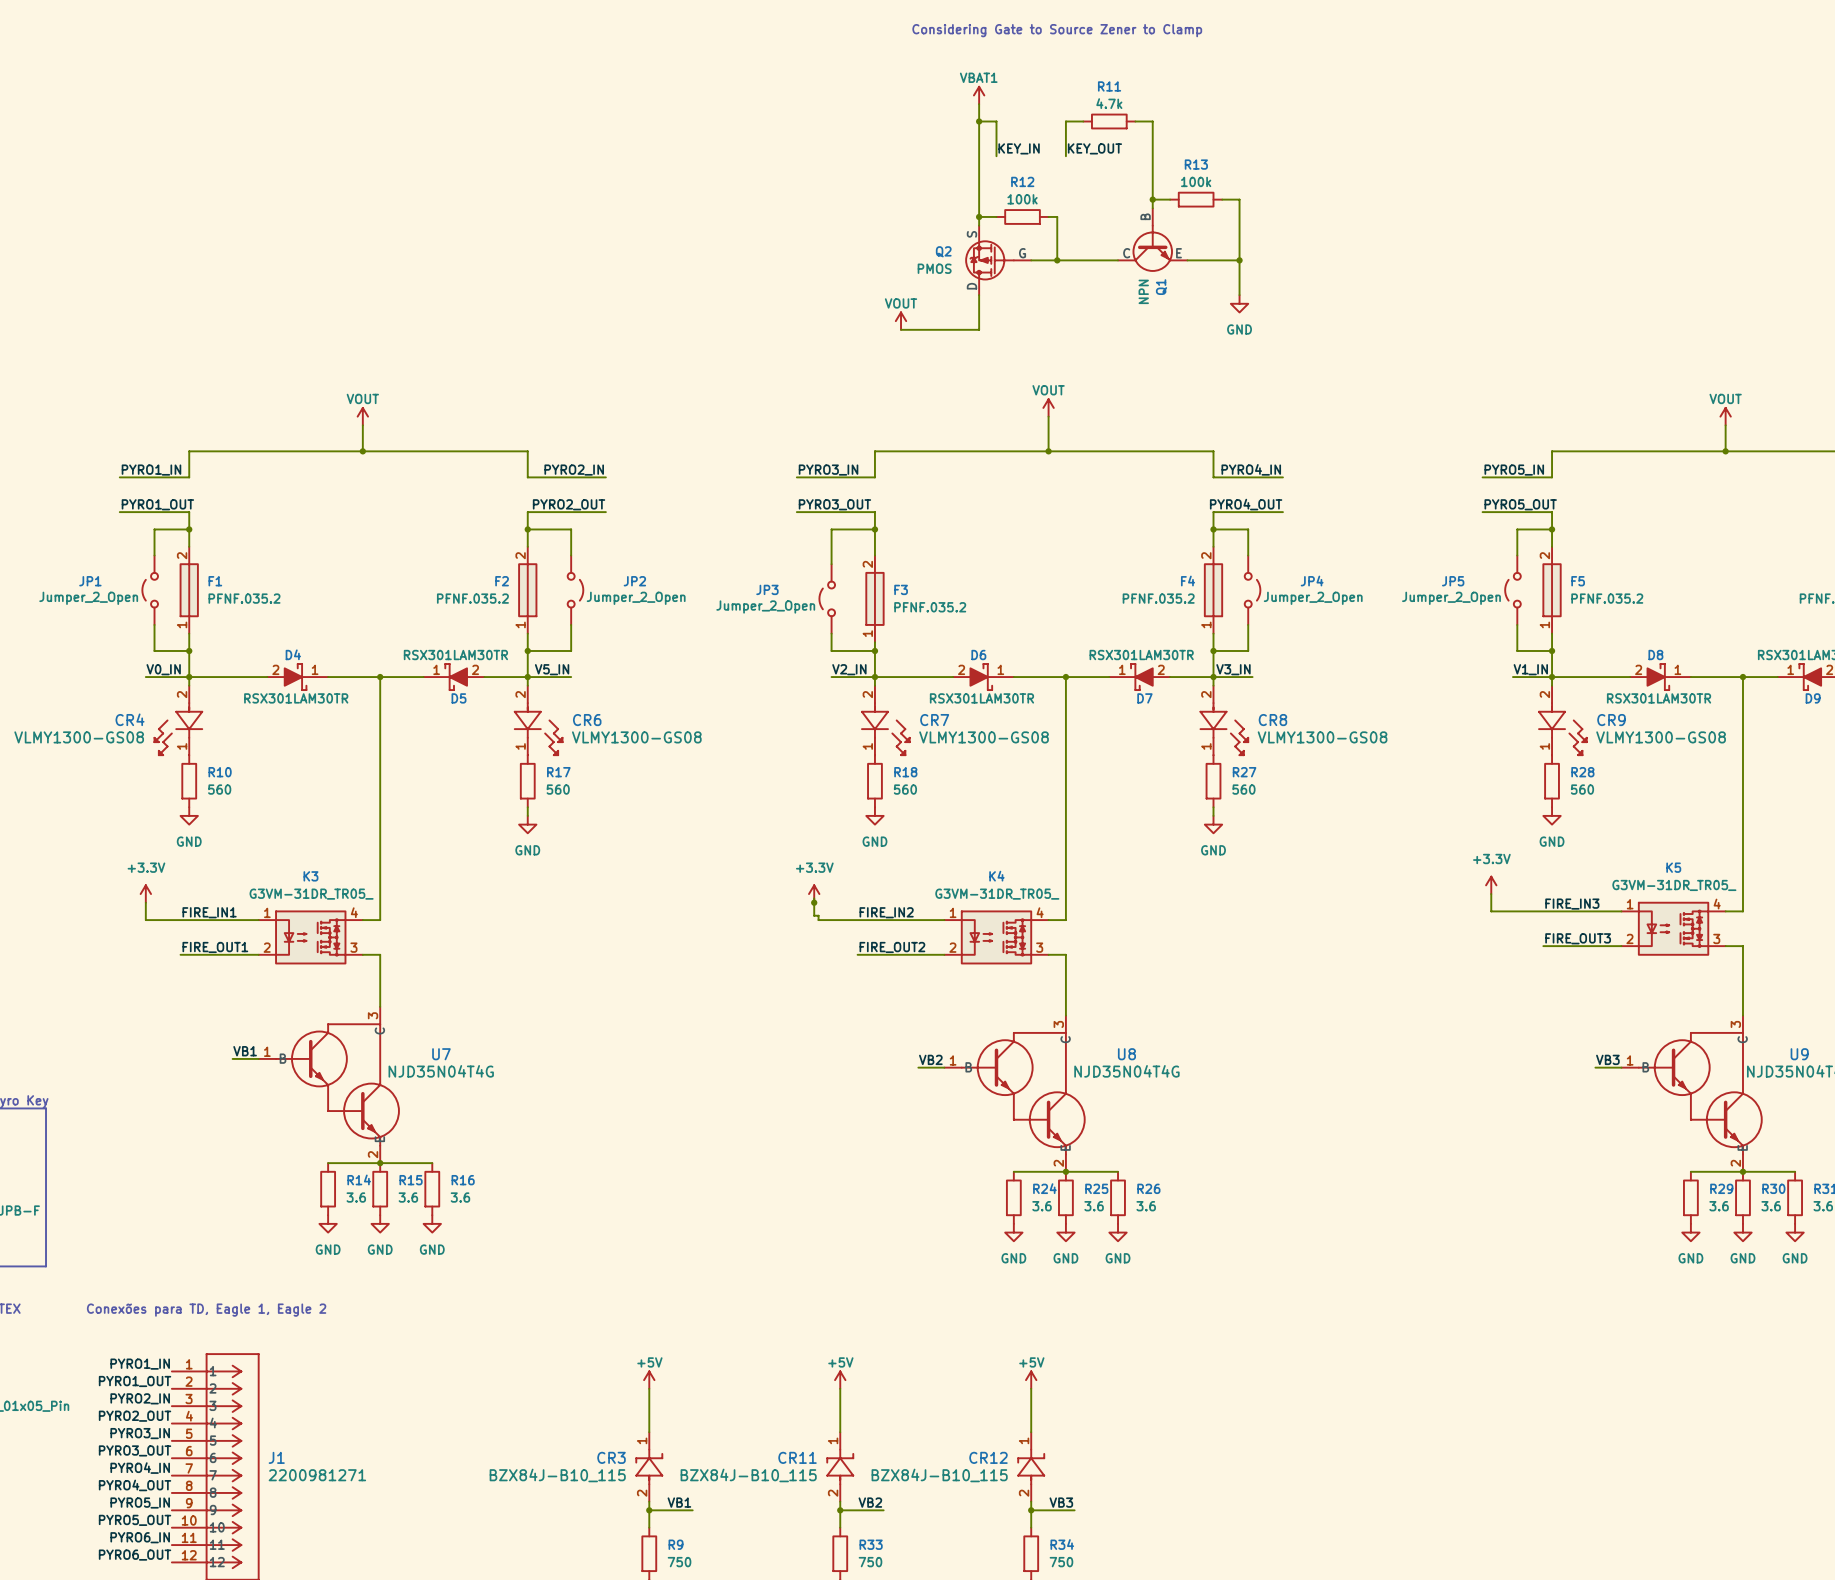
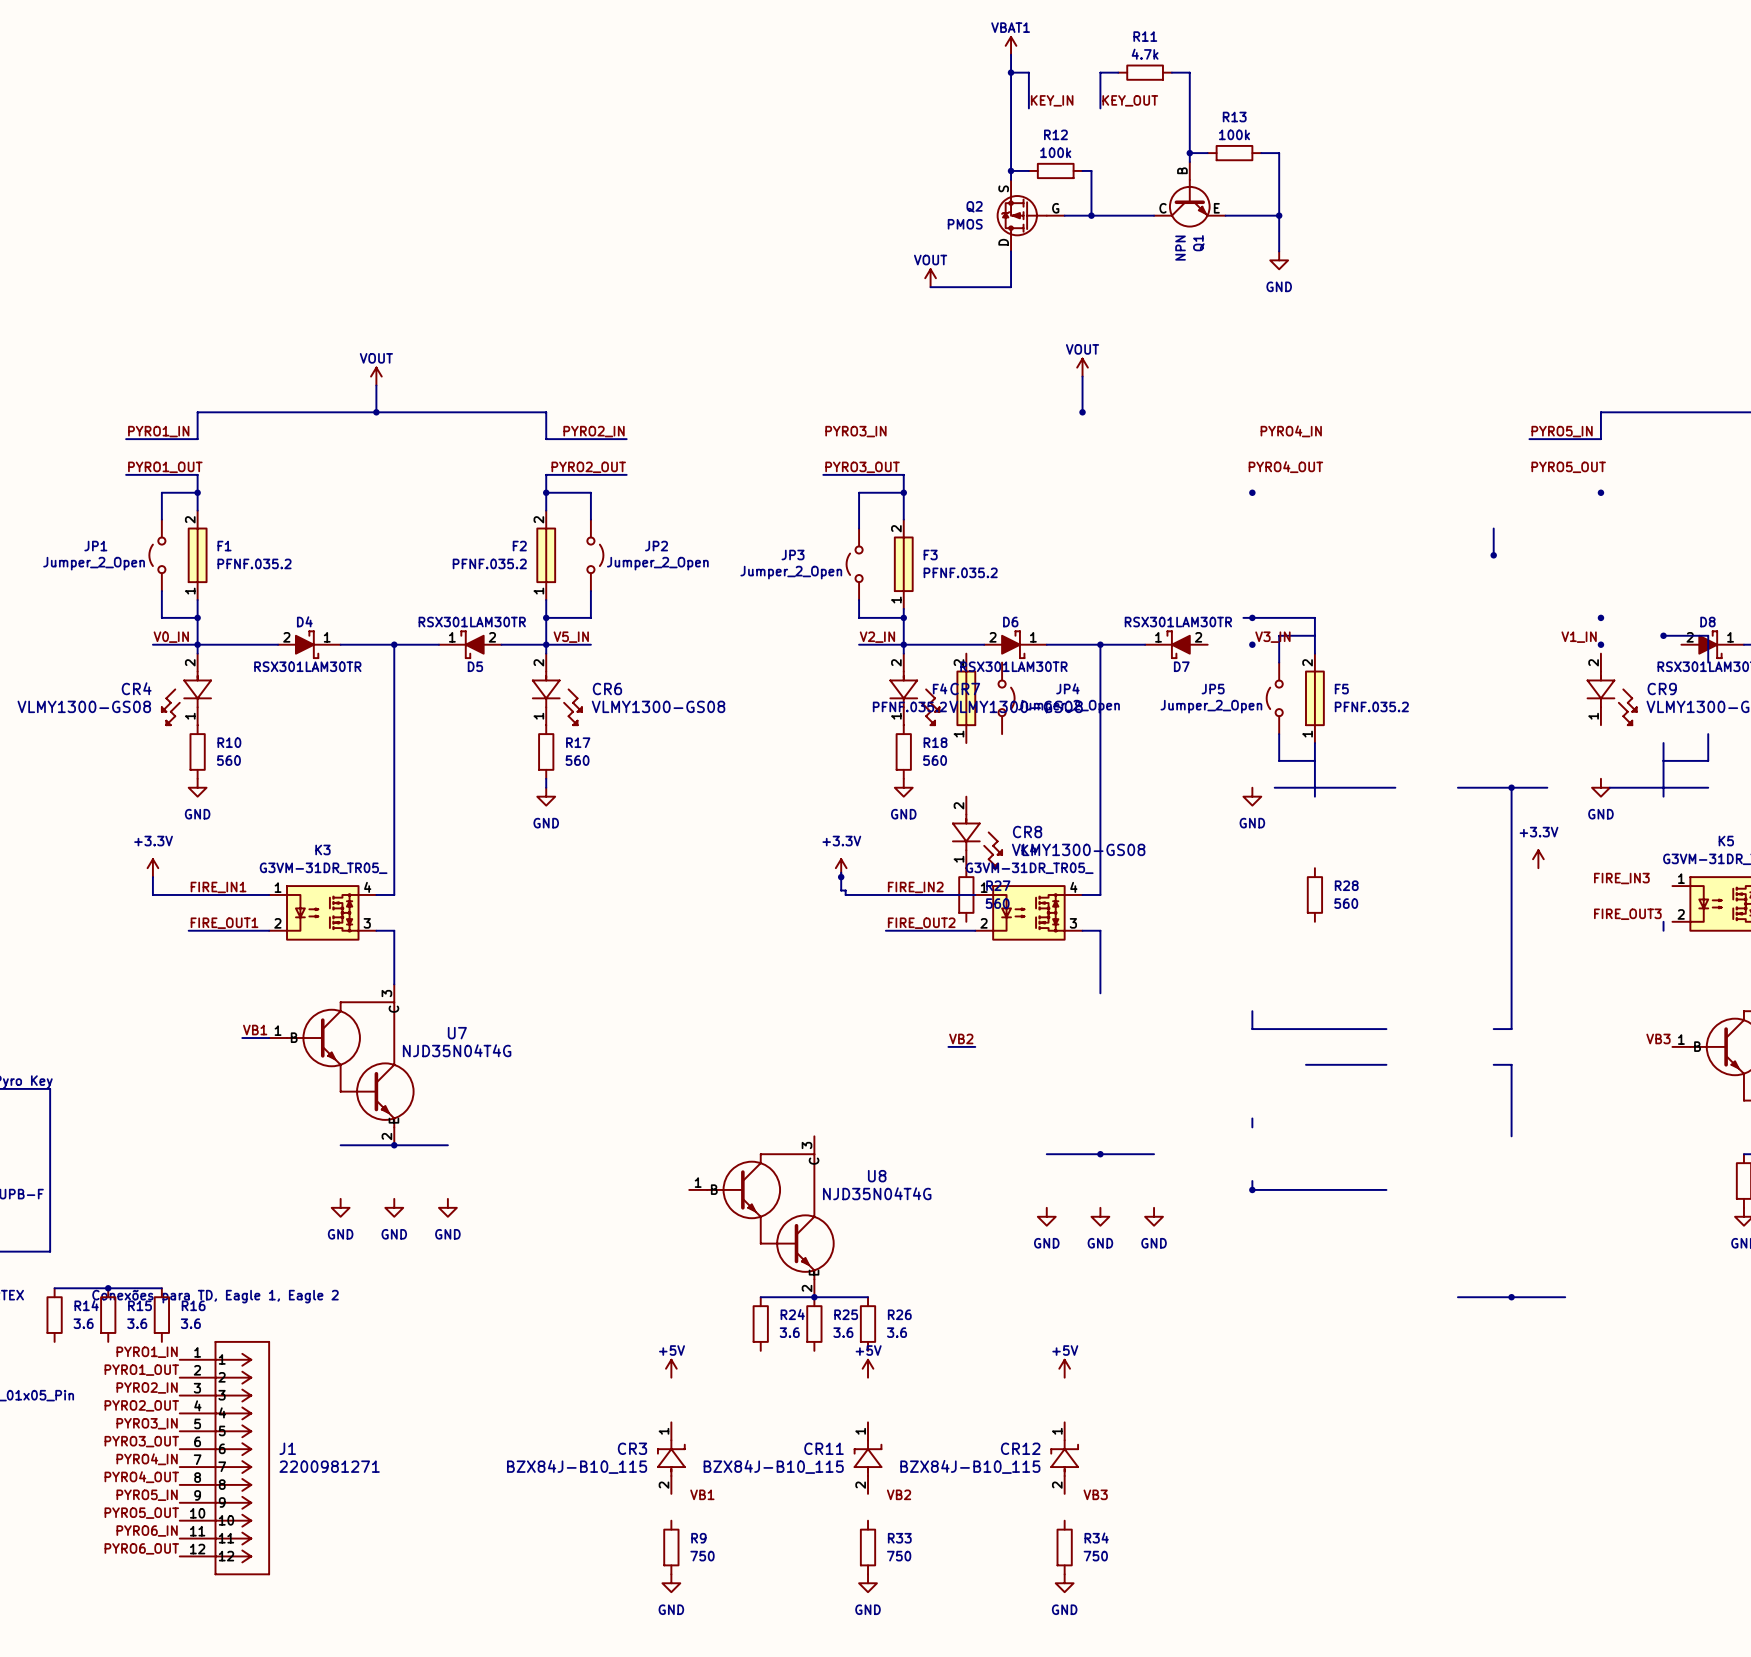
wire: (796, 477) (874, 477) (874, 451) (1213, 451) (1213, 477) (1282, 477) -> none
wire: (1282, 512) (1213, 512) (1213, 546) -> none
wire: (1482, 512) (1552, 512) (1552, 546) -> none
wire: (1213, 529) (1248, 529) (1248, 555) -> none
wire: (1552, 529) (1517, 529) (1517, 555) -> none
wire: none -> (1493, 528) (1493, 555)
F4 position: (1213, 590) -> (966, 698)
JP4 position: (1252, 590) -> (1006, 698)
junction: none -> (1493, 555)
JP5 position: (1512, 590) -> (1274, 698)
F5 position: (1552, 590) -> (1314, 698)
wire: (1248, 624) (1248, 650) -> (1314, 653) (1314, 617) (1288, 617)
wire: (1517, 624) (1517, 650) (1552, 650) -> none
wire: (1213, 633) (1213, 685) -> (1314, 743) (1314, 796)
wire: (1552, 633) (1552, 685) -> (1663, 743) (1663, 796)
wire: none -> (1243, 617) (1252, 617)
wire: none -> (1314, 635) (1279, 635) (1279, 662)
wire: none -> (1663, 635) (1708, 635) (1708, 662)
junction: none -> (1663, 635)
wire: (1170, 677) (1252, 677) -> none
wire: (1512, 677) (1630, 677) -> none
CR8 position: (1224, 720) -> (977, 832)
wire: none -> (1279, 734) (1279, 760) (1314, 760)
wire: none -> (1708, 734) (1708, 760) (1663, 760)
R27 position: (1213, 781) -> (966, 894)
R28 position: (1552, 781) -> (1314, 894)
wire: (1213, 807) (1213, 815) -> none
wire: none -> (1274, 787) (1395, 787)
wire: none -> (1457, 787) (1547, 787)
wire: none -> (1511, 787) (1511, 1029) (1493, 1029)
junction: none -> (1511, 787)
wire: none -> (1609, 787) (1708, 787)
wire: (1491, 894) (1491, 911) (1621, 911) -> none
wire: (1543, 946) (1621, 946) -> none
wire: none -> (1663, 921) (1663, 930)
wire: none -> (1252, 1011) (1252, 1029) (1386, 1029)
wire: (1595, 1067) (1621, 1067) -> none
wire: none -> (1305, 1064) (1386, 1064)
wire: none -> (1493, 1064) (1511, 1064) (1511, 1136)
U8 position: (1014, 1093) -> (761, 1216)
wire: none -> (1252, 1118) (1252, 1127)
R14 position: (328, 1189) -> (54, 1315)
R15 position: (380, 1189) -> (108, 1315)
R16 position: (432, 1189) -> (161, 1315)
R24 position: (1013, 1197) -> (760, 1324)
R25 position: (1065, 1197) -> (814, 1324)
R26 position: (1118, 1197) -> (868, 1324)
wire: none -> (1252, 1181) (1252, 1189) (1386, 1189)
junction: none -> (1252, 1189)
wire: none -> (54, 1288) (161, 1288)
junction: none -> (108, 1288)
wire: none -> (760, 1297) (868, 1297)
junction: none -> (814, 1297)
wire: none -> (1457, 1297) (1565, 1297)
junction: none -> (1511, 1297)
wire: (649, 1388) (649, 1432) -> none
wire: (840, 1388) (840, 1432) -> none
wire: (1031, 1388) (1031, 1432) -> none
wire: (649, 1501) (649, 1527) -> none
wire: (840, 1501) (840, 1527) -> none
wire: (1031, 1501) (1031, 1527) -> none
wire: (649, 1510) (692, 1510) -> none
junction: (649, 1510) -> none
wire: (840, 1510) (883, 1510) -> none
junction: (840, 1510) -> none
wire: (1031, 1510) (1074, 1510) -> none
junction: (1031, 1510) -> none

